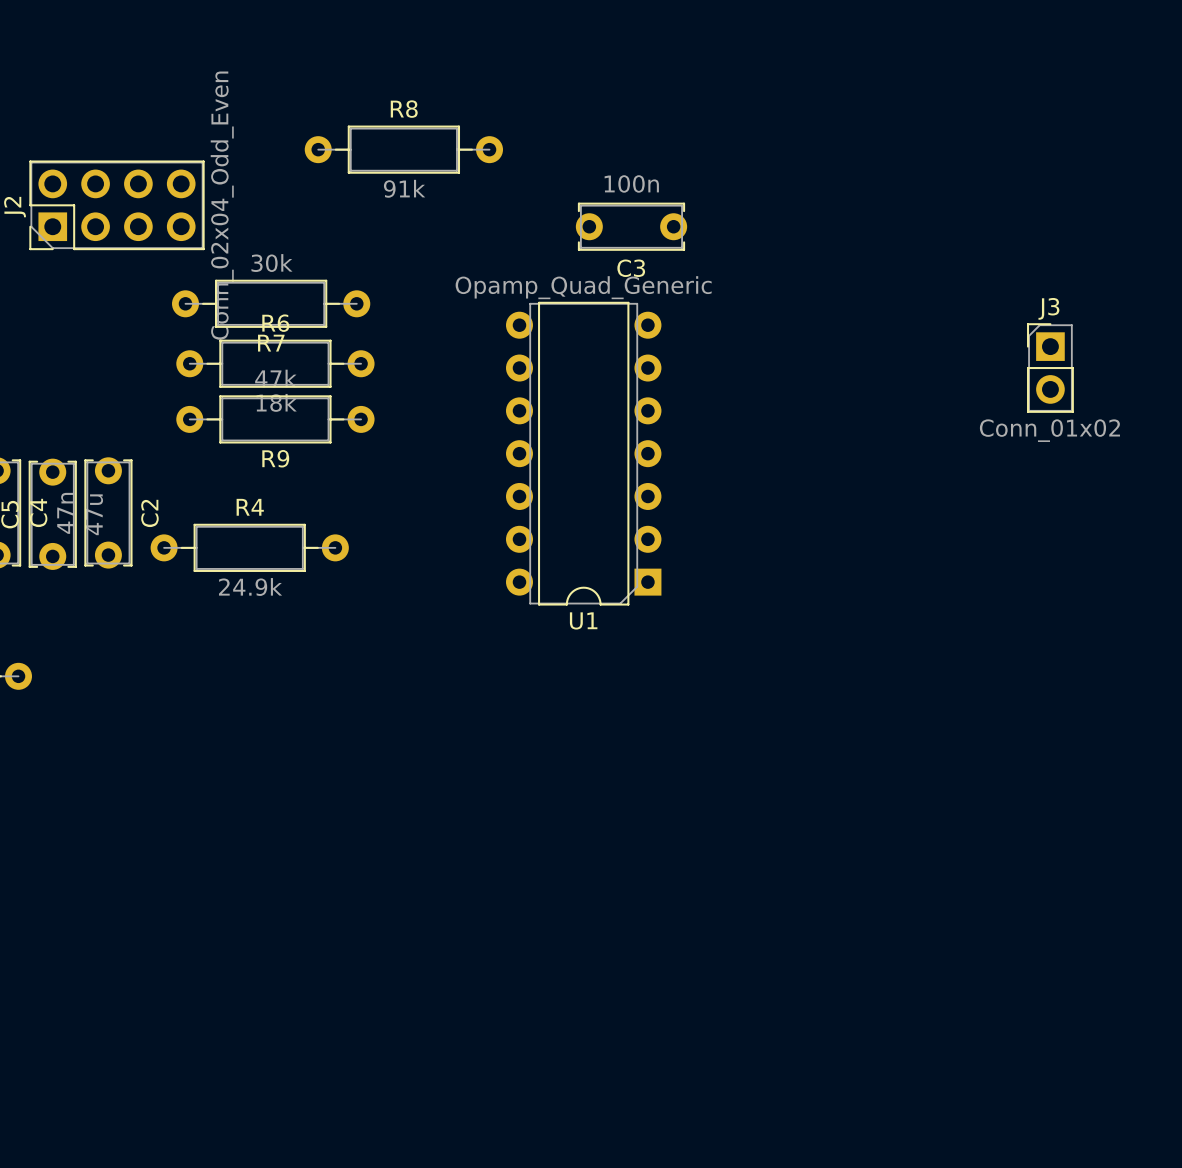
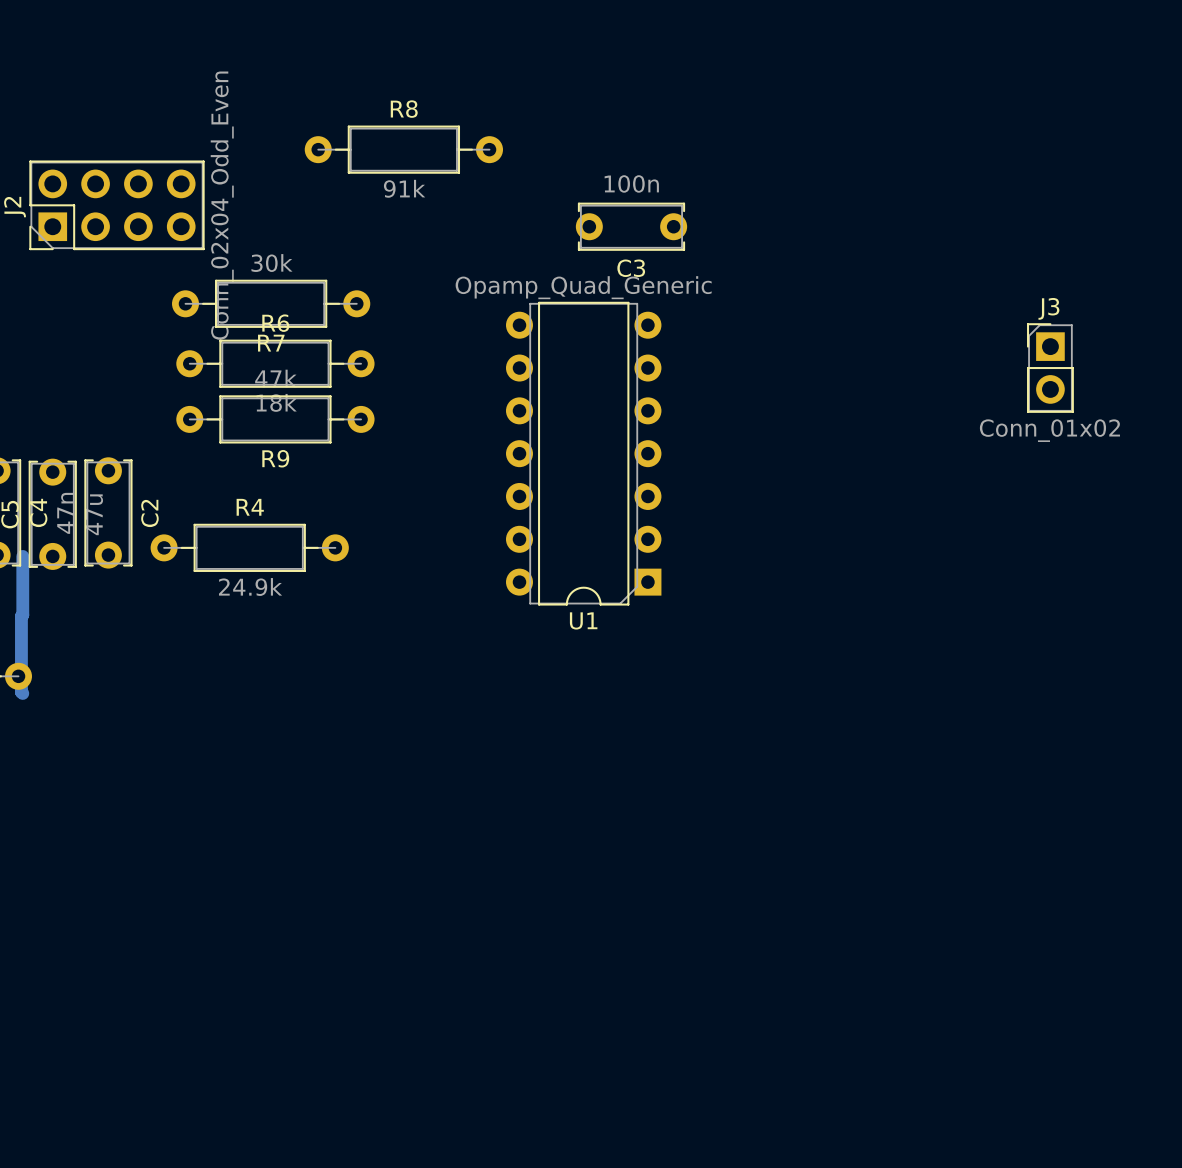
bottom track: none -> (22, 556) (22, 693)

